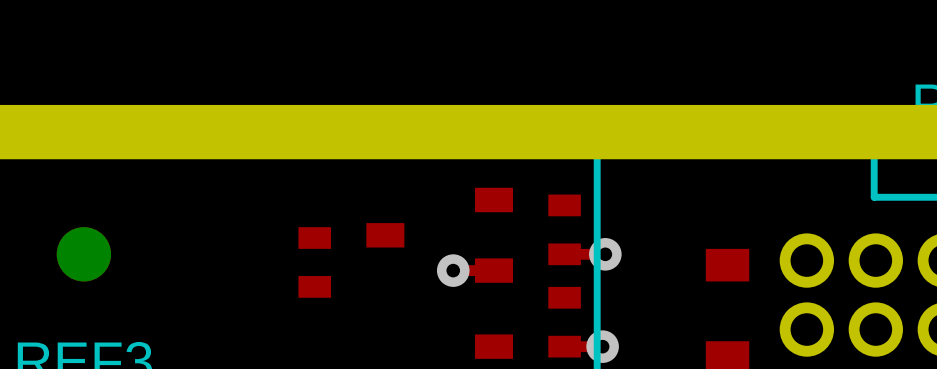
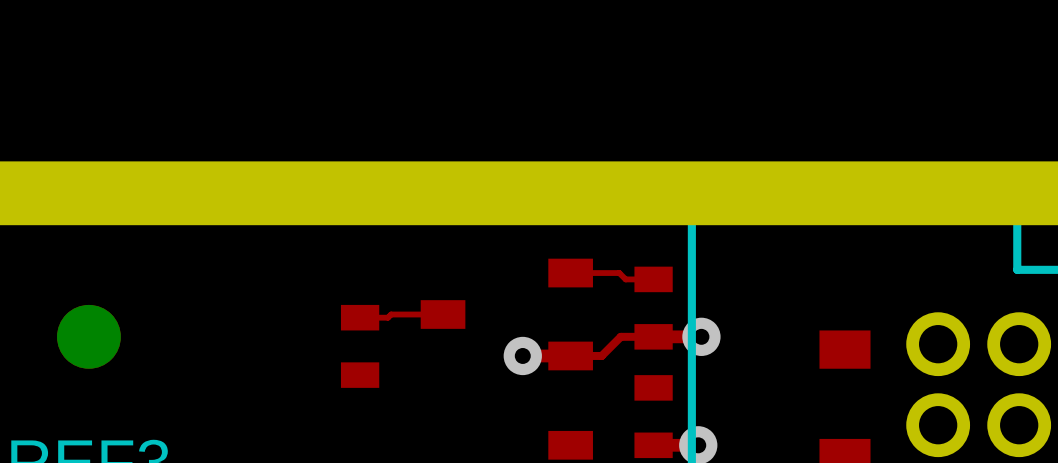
top track: none -> (570, 273) (619, 273) (625, 279) (653, 279)
top track: none -> (443, 314) (391, 314) (387, 317) (360, 317)
top track: none -> (653, 336) (620, 336) (601, 355) (570, 355)

